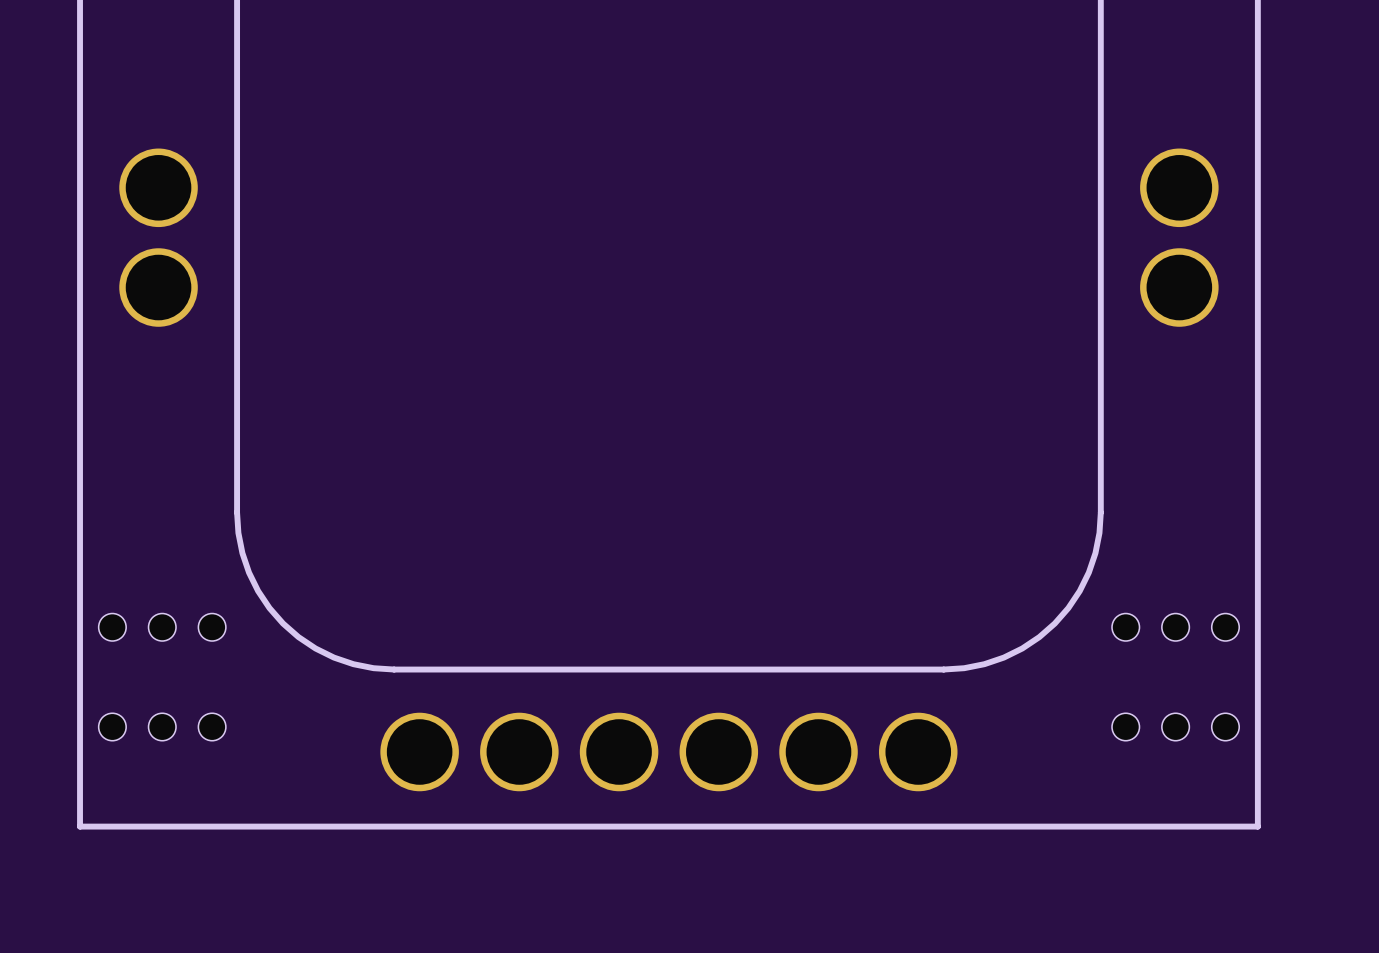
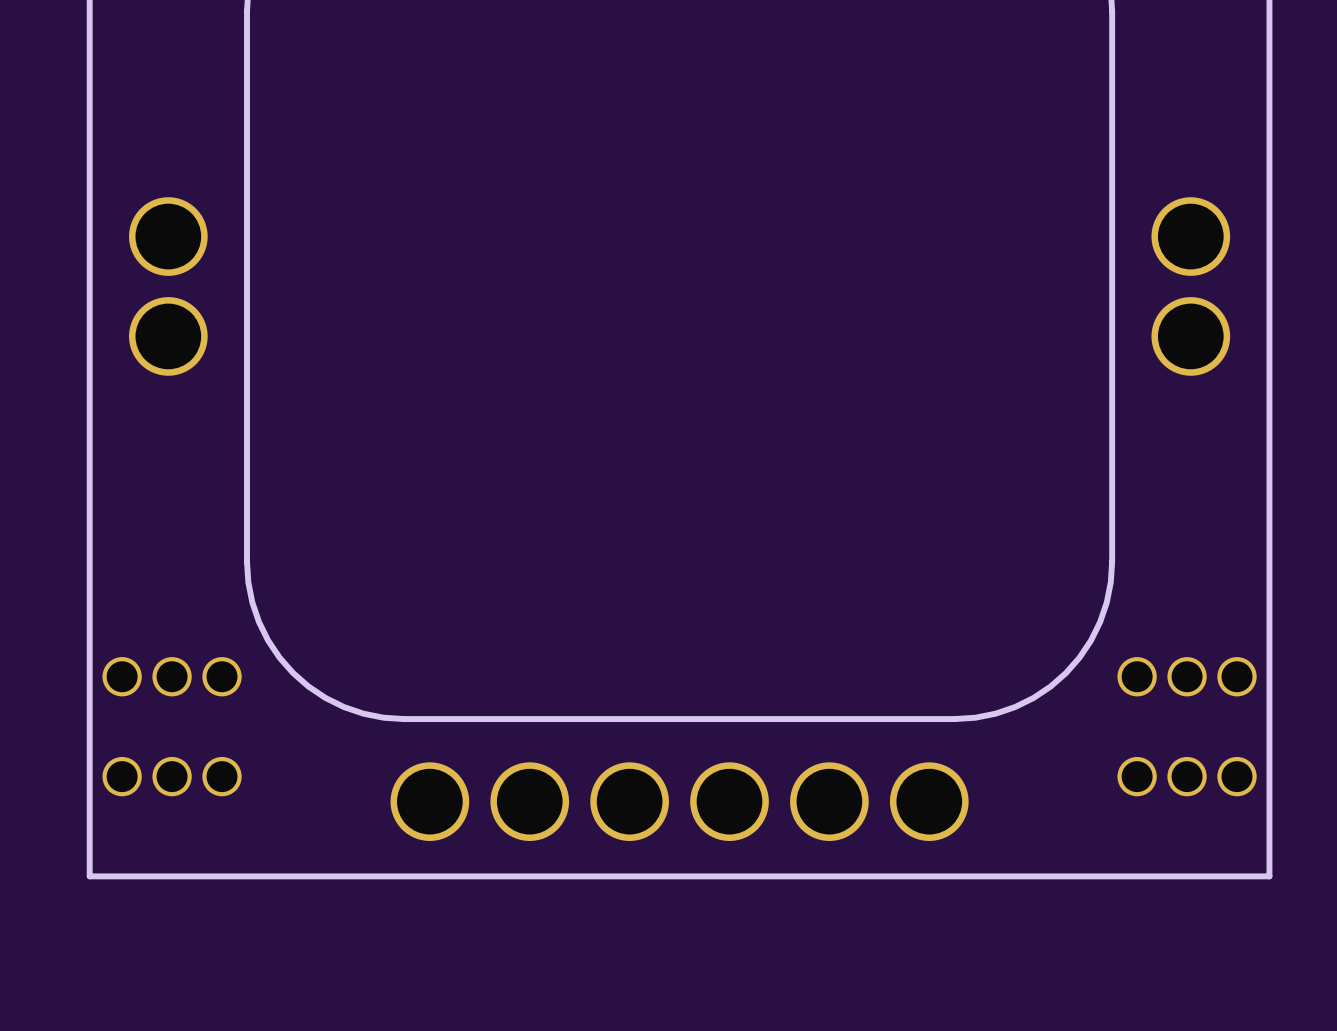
part: (162, 627) -> none
part: (1175, 627) -> none
part: none -> (172, 726)
part: none -> (1187, 726)
part: (162, 726) -> none
part: (1175, 726) -> none

